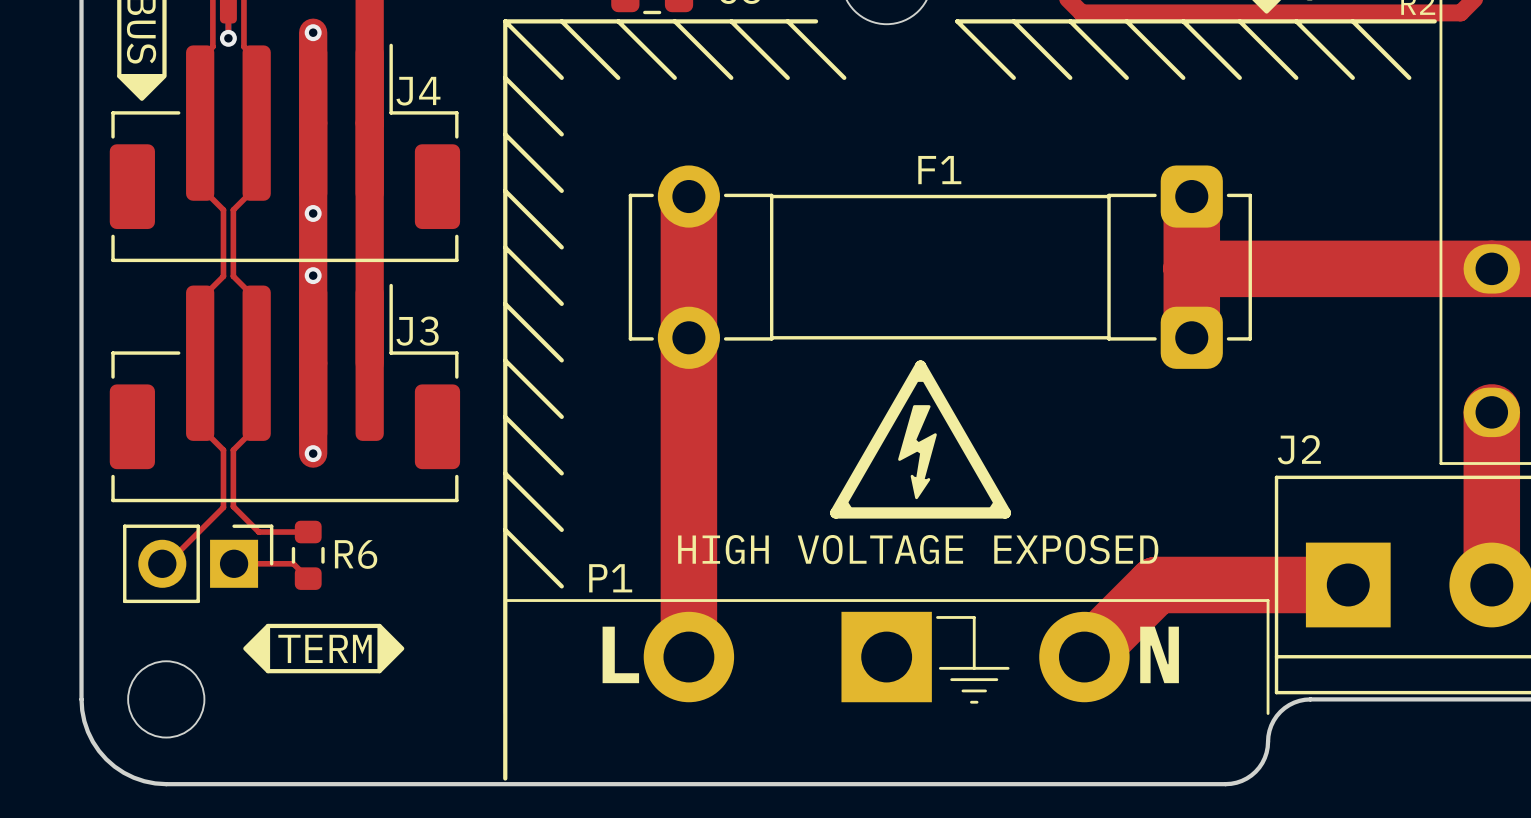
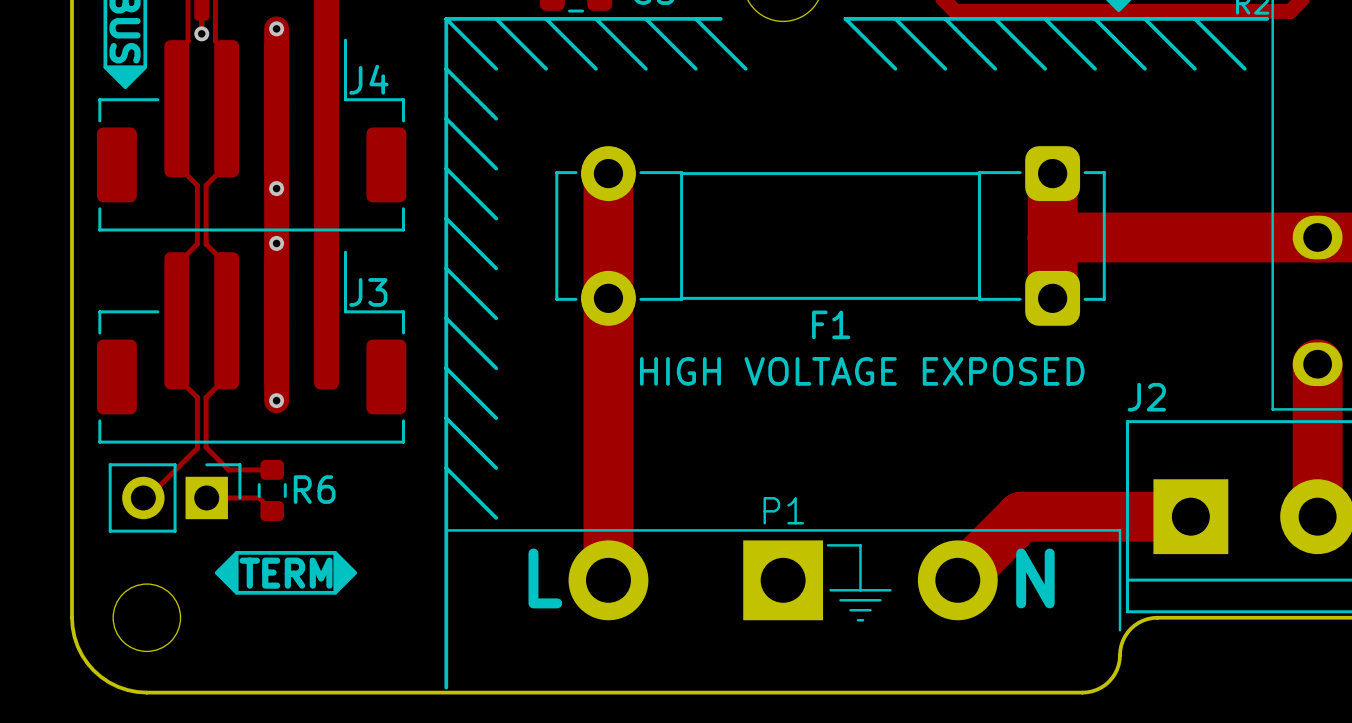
F1 name position: F1 (939, 170) -> F1 (831, 324)
drawing: [830, 360, 1011, 519] -> none
text position: HIGH VOLTAGE EXPOSED (918, 549) -> HIGH VOLTAGE EXPOSED (862, 371)
P1 name position: P1 (610, 578) -> P1 (783, 510)

